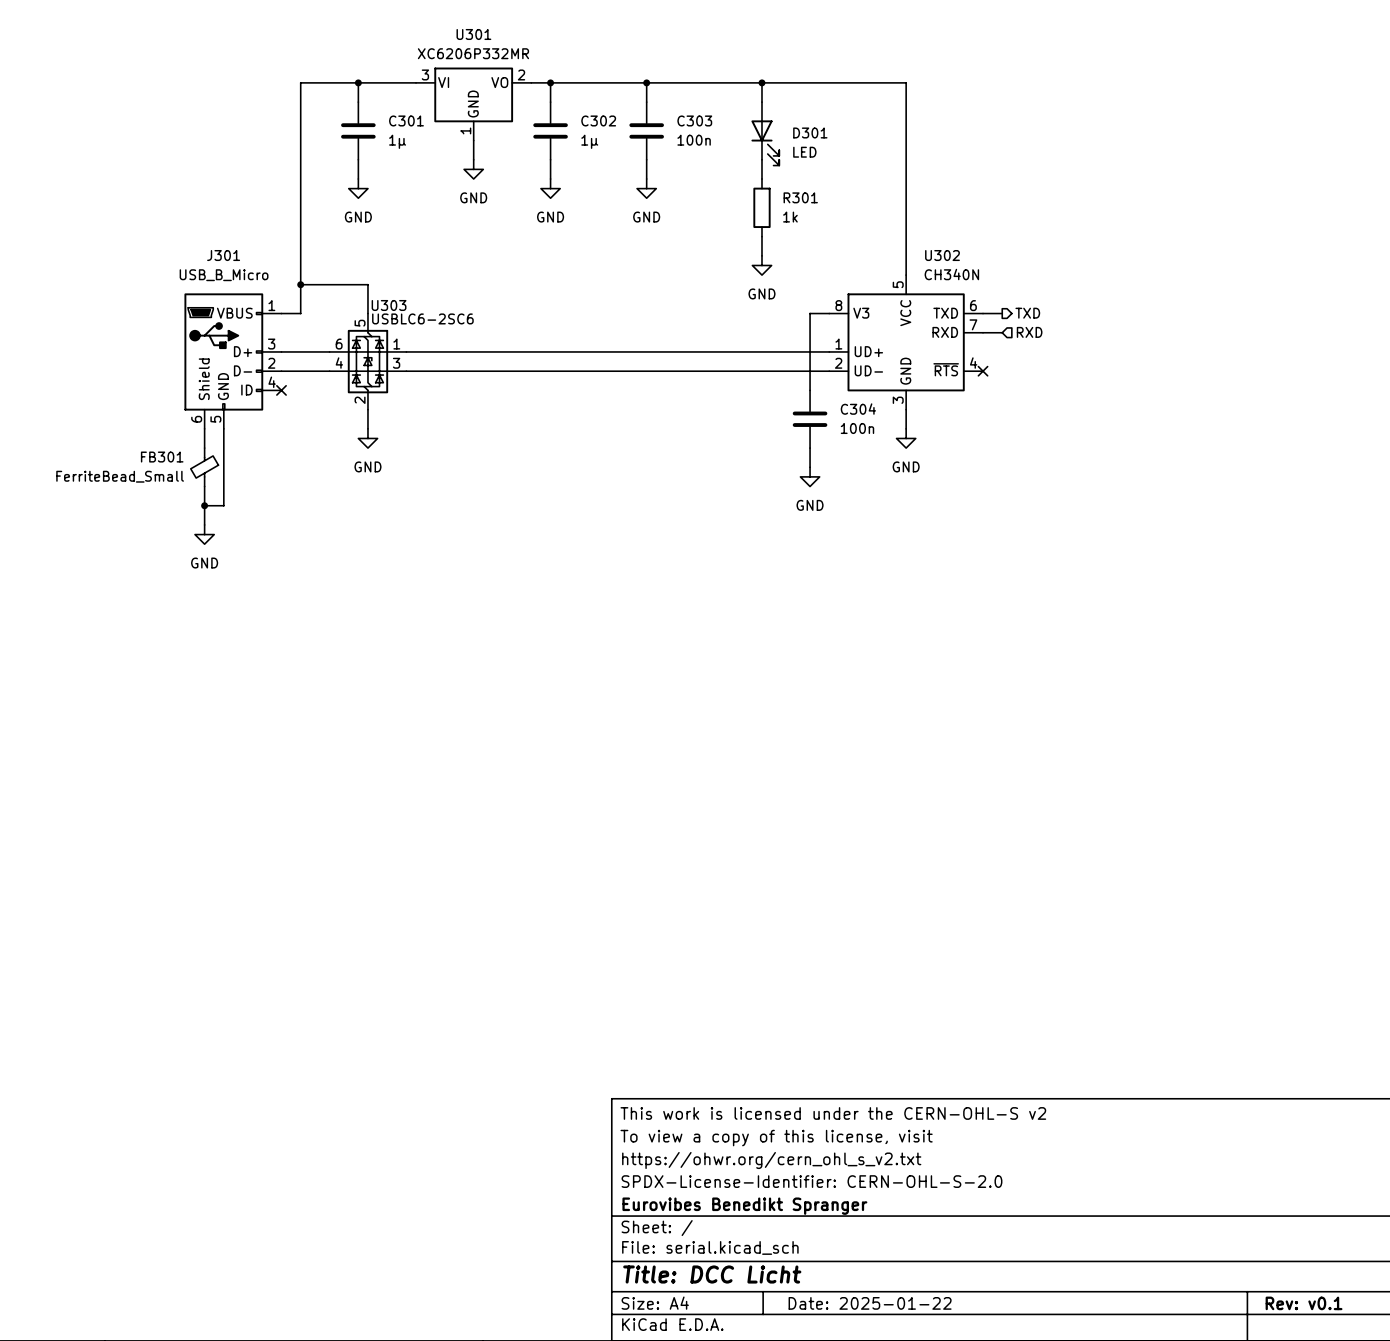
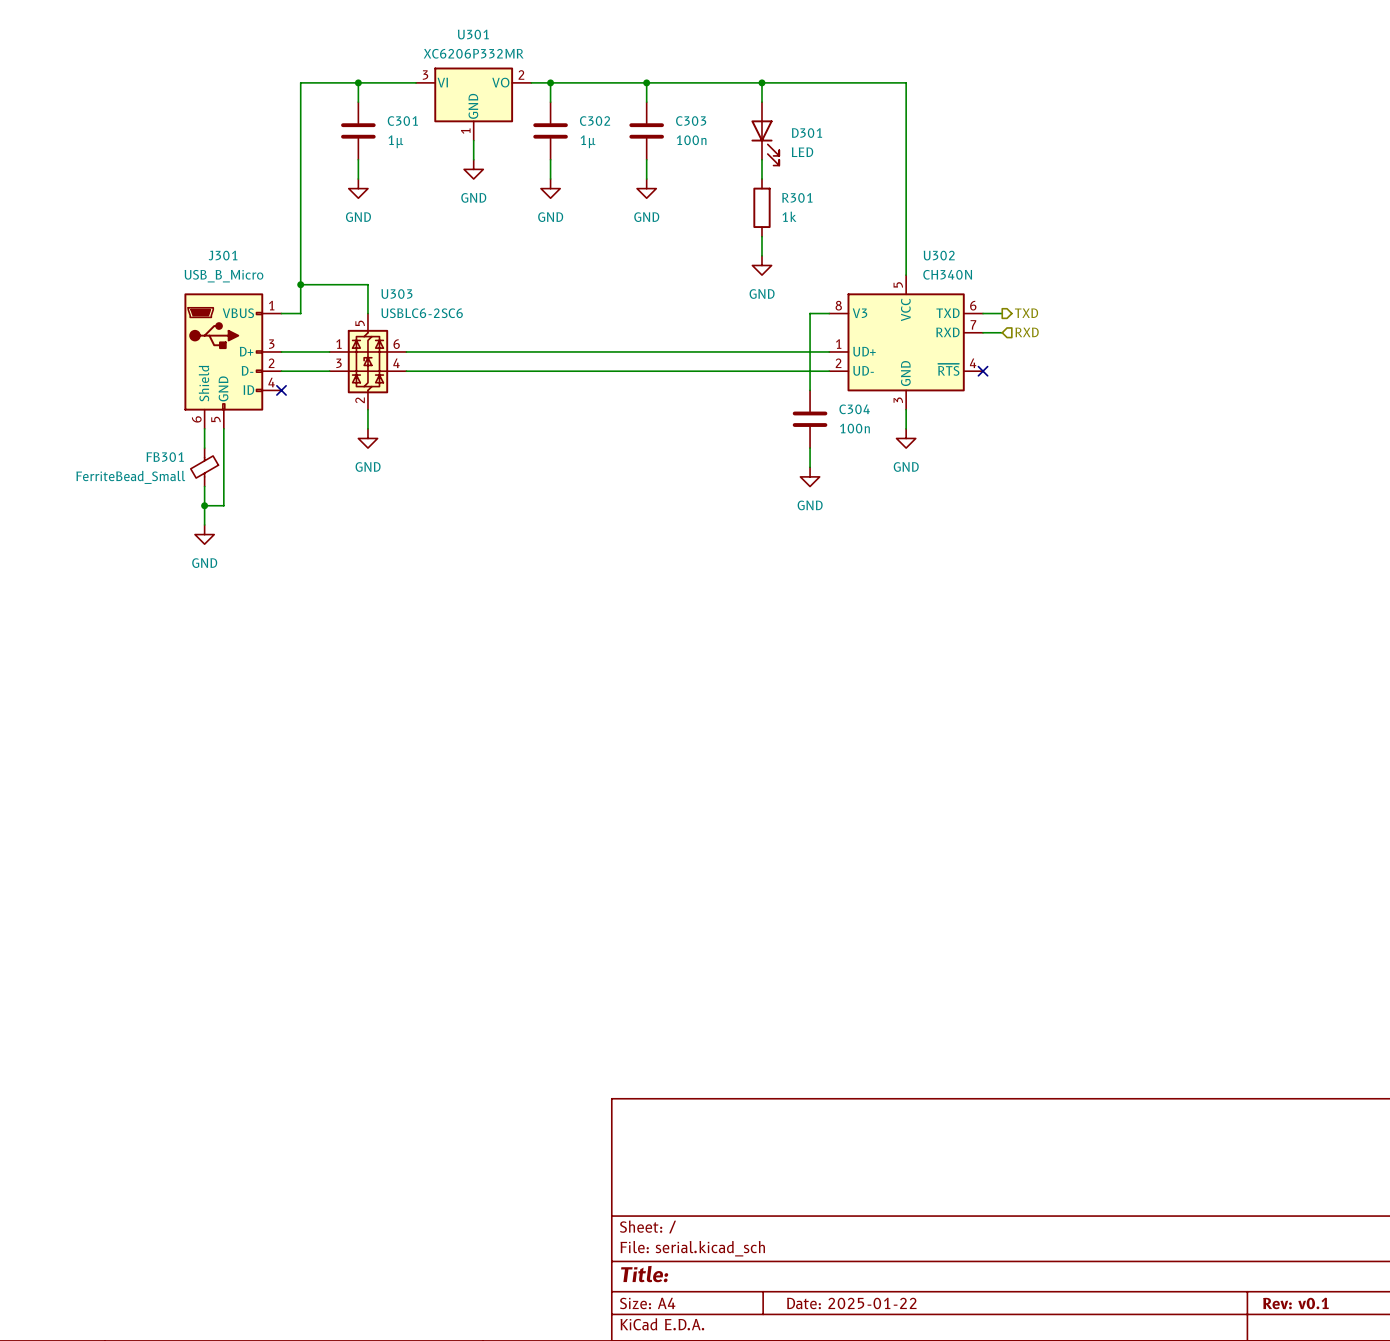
U303 name position: U303 (389, 305) -> U303 (396, 294)
U303 value position: USBLC6-2SC6 (422, 318) -> USBLC6-2SC6 (422, 313)
U303 flip: as is (367, 361) -> left-right (367, 361)
title block: This work is licensed under the CERN-OHL-S v2 (833, 1113) -> none
title block: To view a copy of this license, visit (776, 1138) -> none
title block: https://ohwr.org/cern_ohl_s_v2.txt (771, 1160) -> none
title block: SPDX-License-Identifier: CERN-OHL-S-2.0 (811, 1181) -> none
title block: Eurovibes Benedikt Spranger (744, 1206) -> none
title block: Title: DCC Licht (712, 1274) -> Title: (644, 1274)

